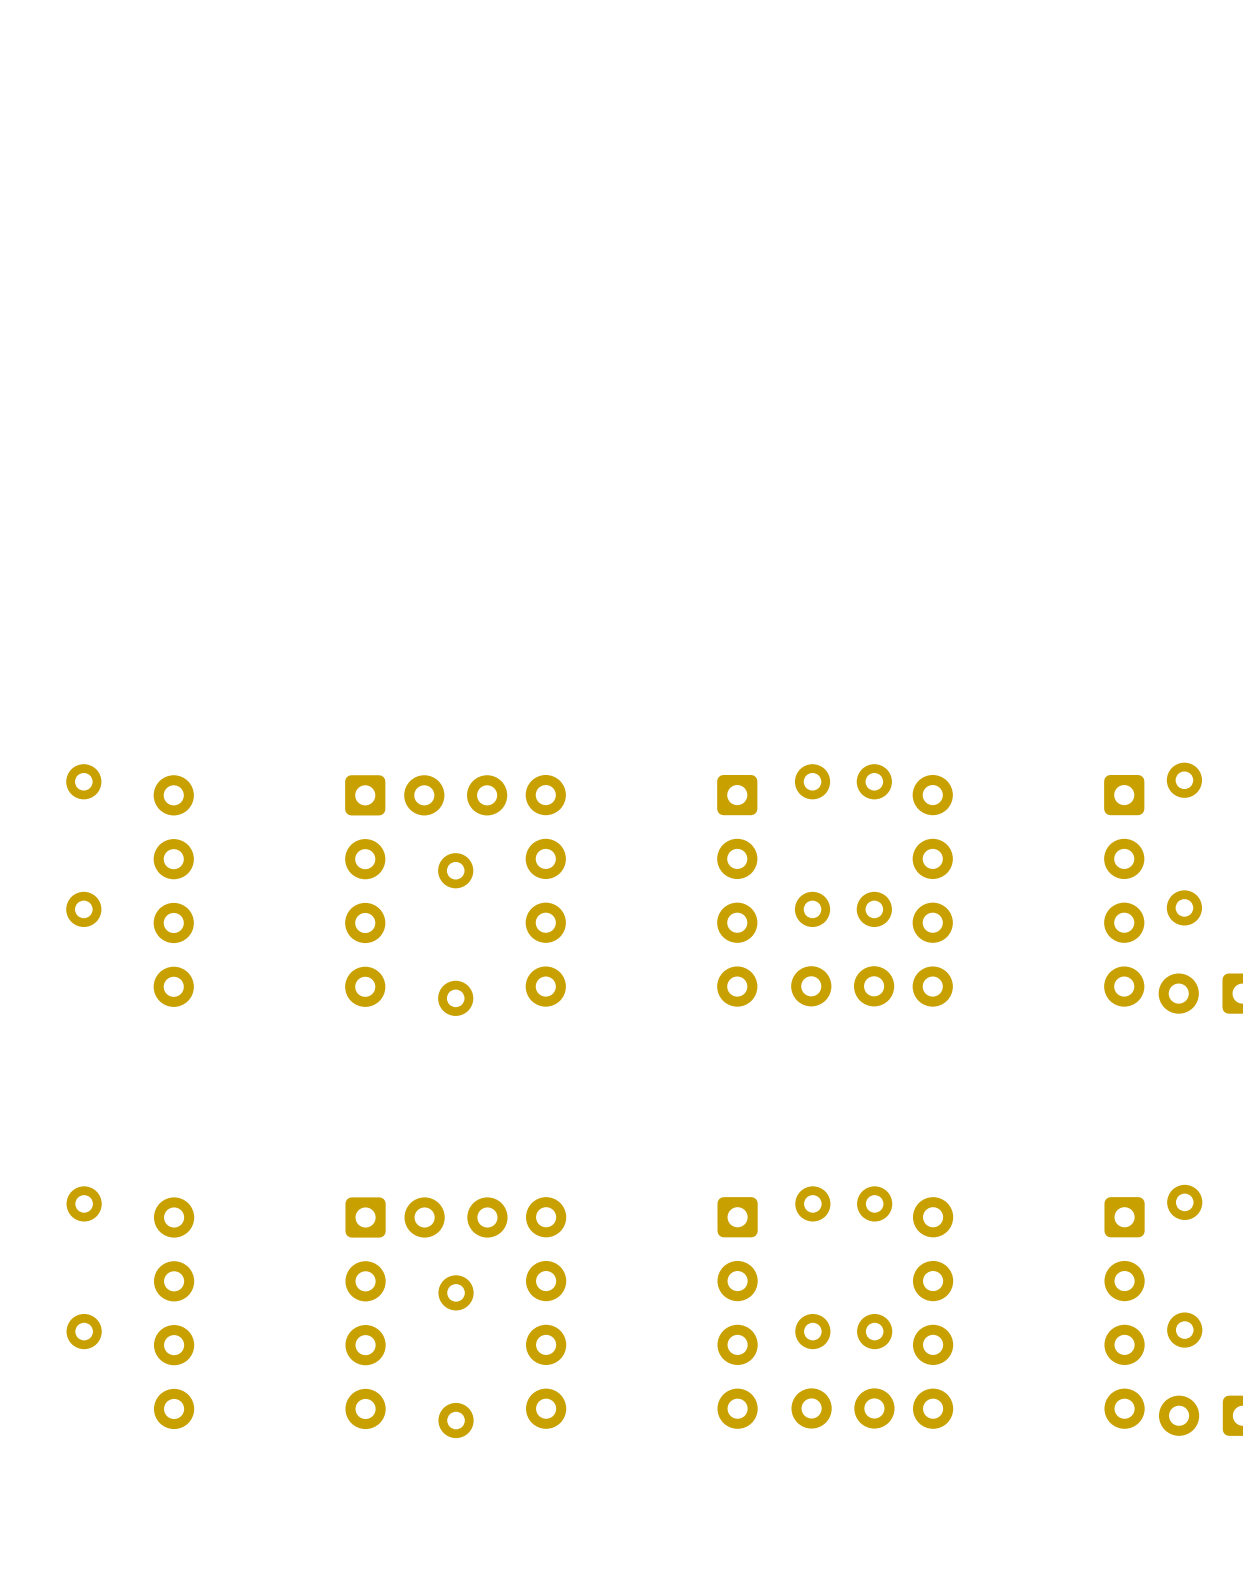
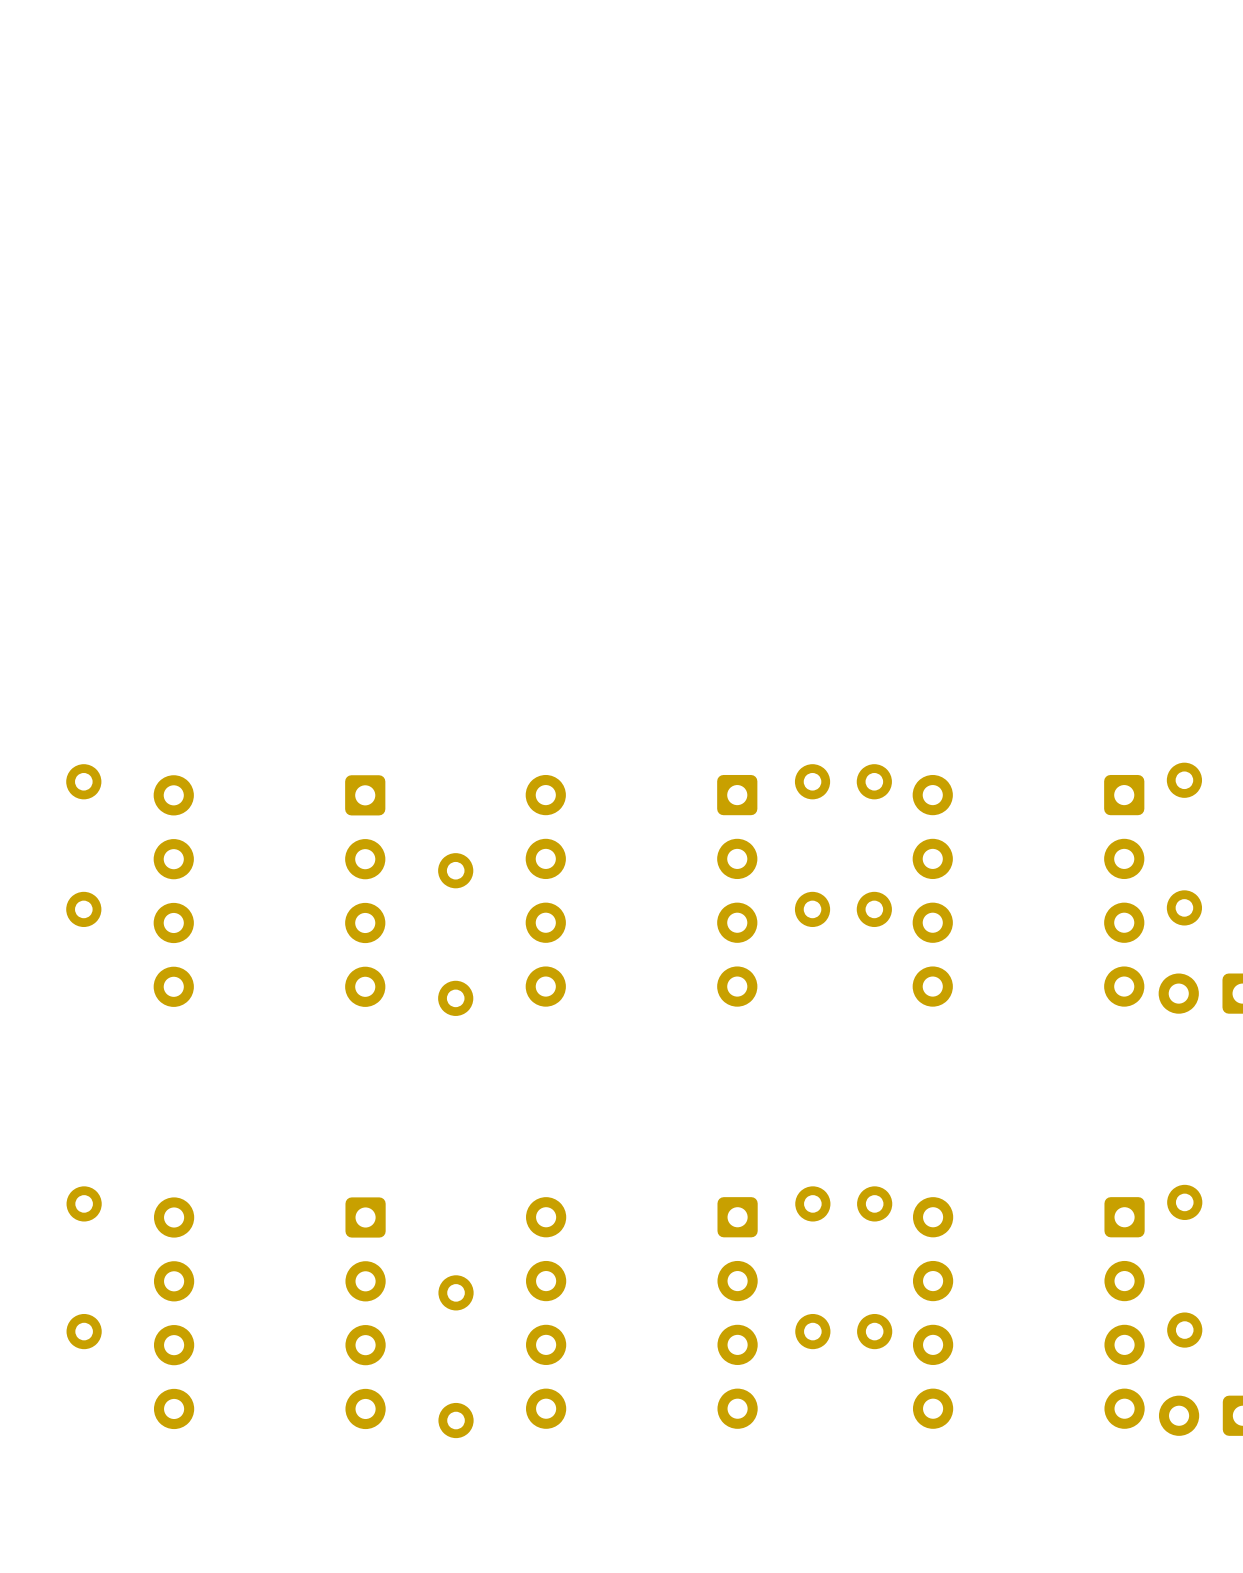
part: (455, 795) -> none
part: (842, 986) -> none
part: (456, 1217) -> none
part: (843, 1408) -> none

